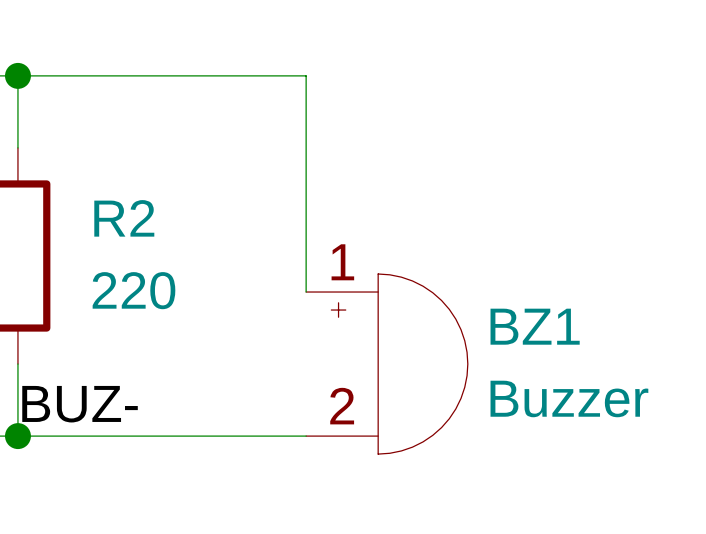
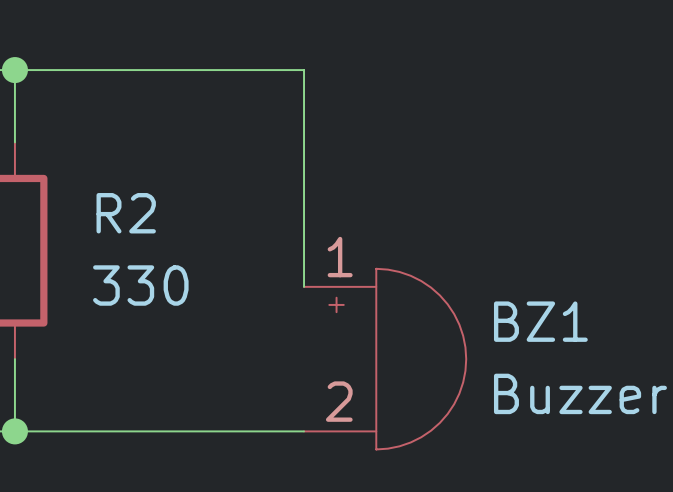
R2 value: 220 (133, 290) -> 330 (140, 285)
label: BUZ- (80, 404) -> none

